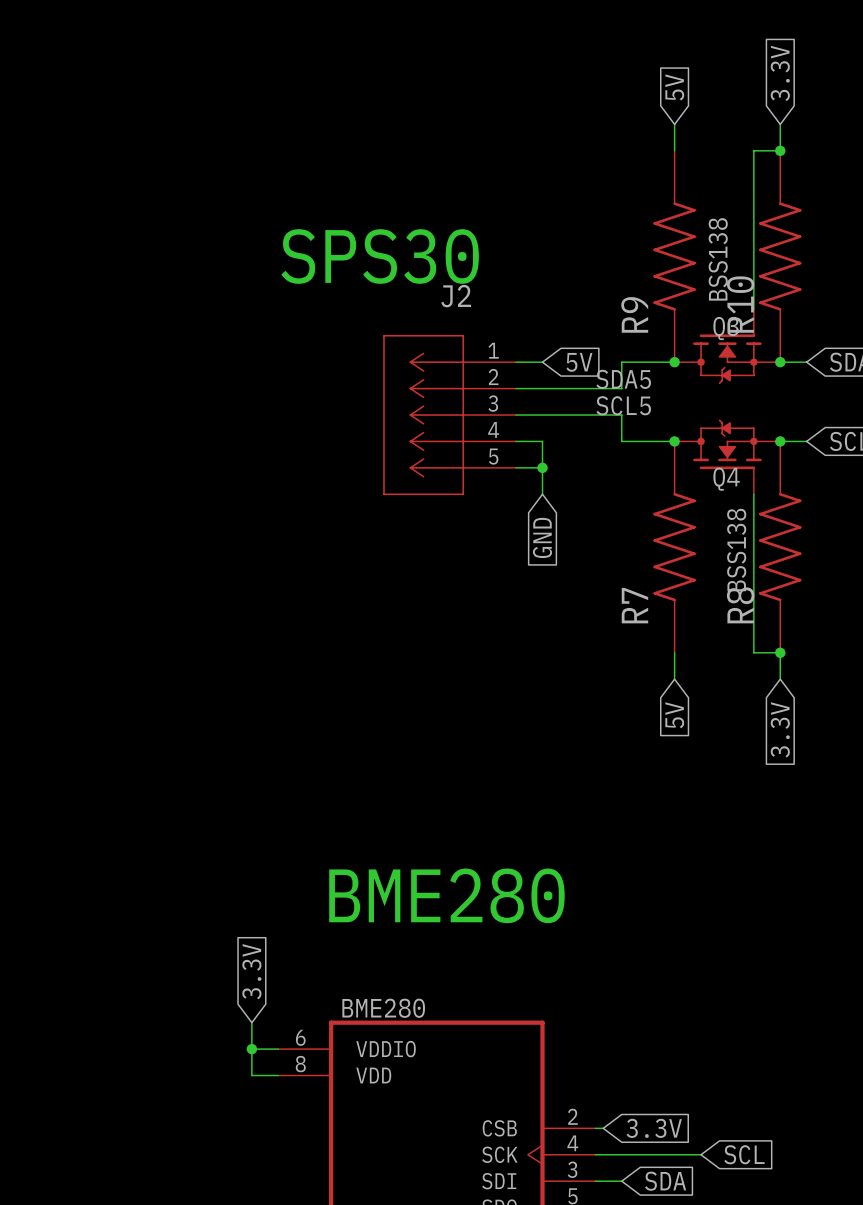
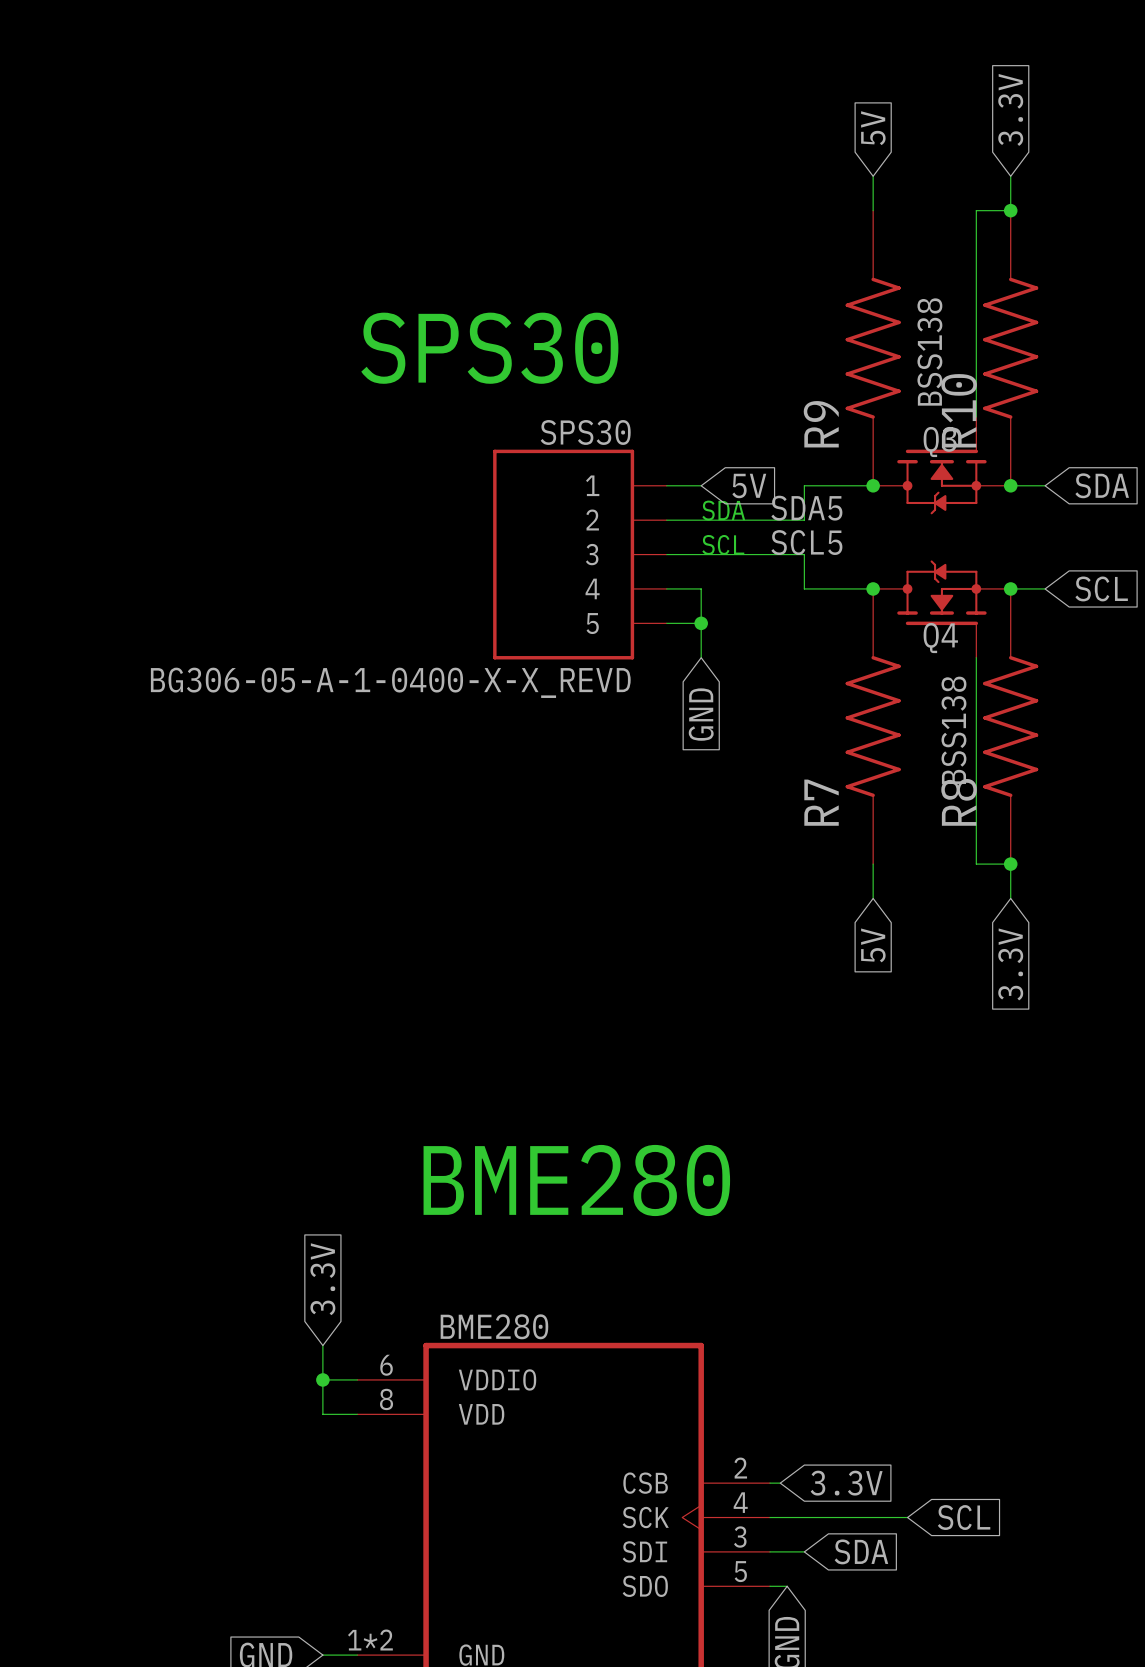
text: none -> SDA (723, 510)
text: none -> SCL (723, 544)
J2: (449, 415) -> none
SPS30: none -> BG306-05-A-1-0400-X-X_REVD (579, 554)

